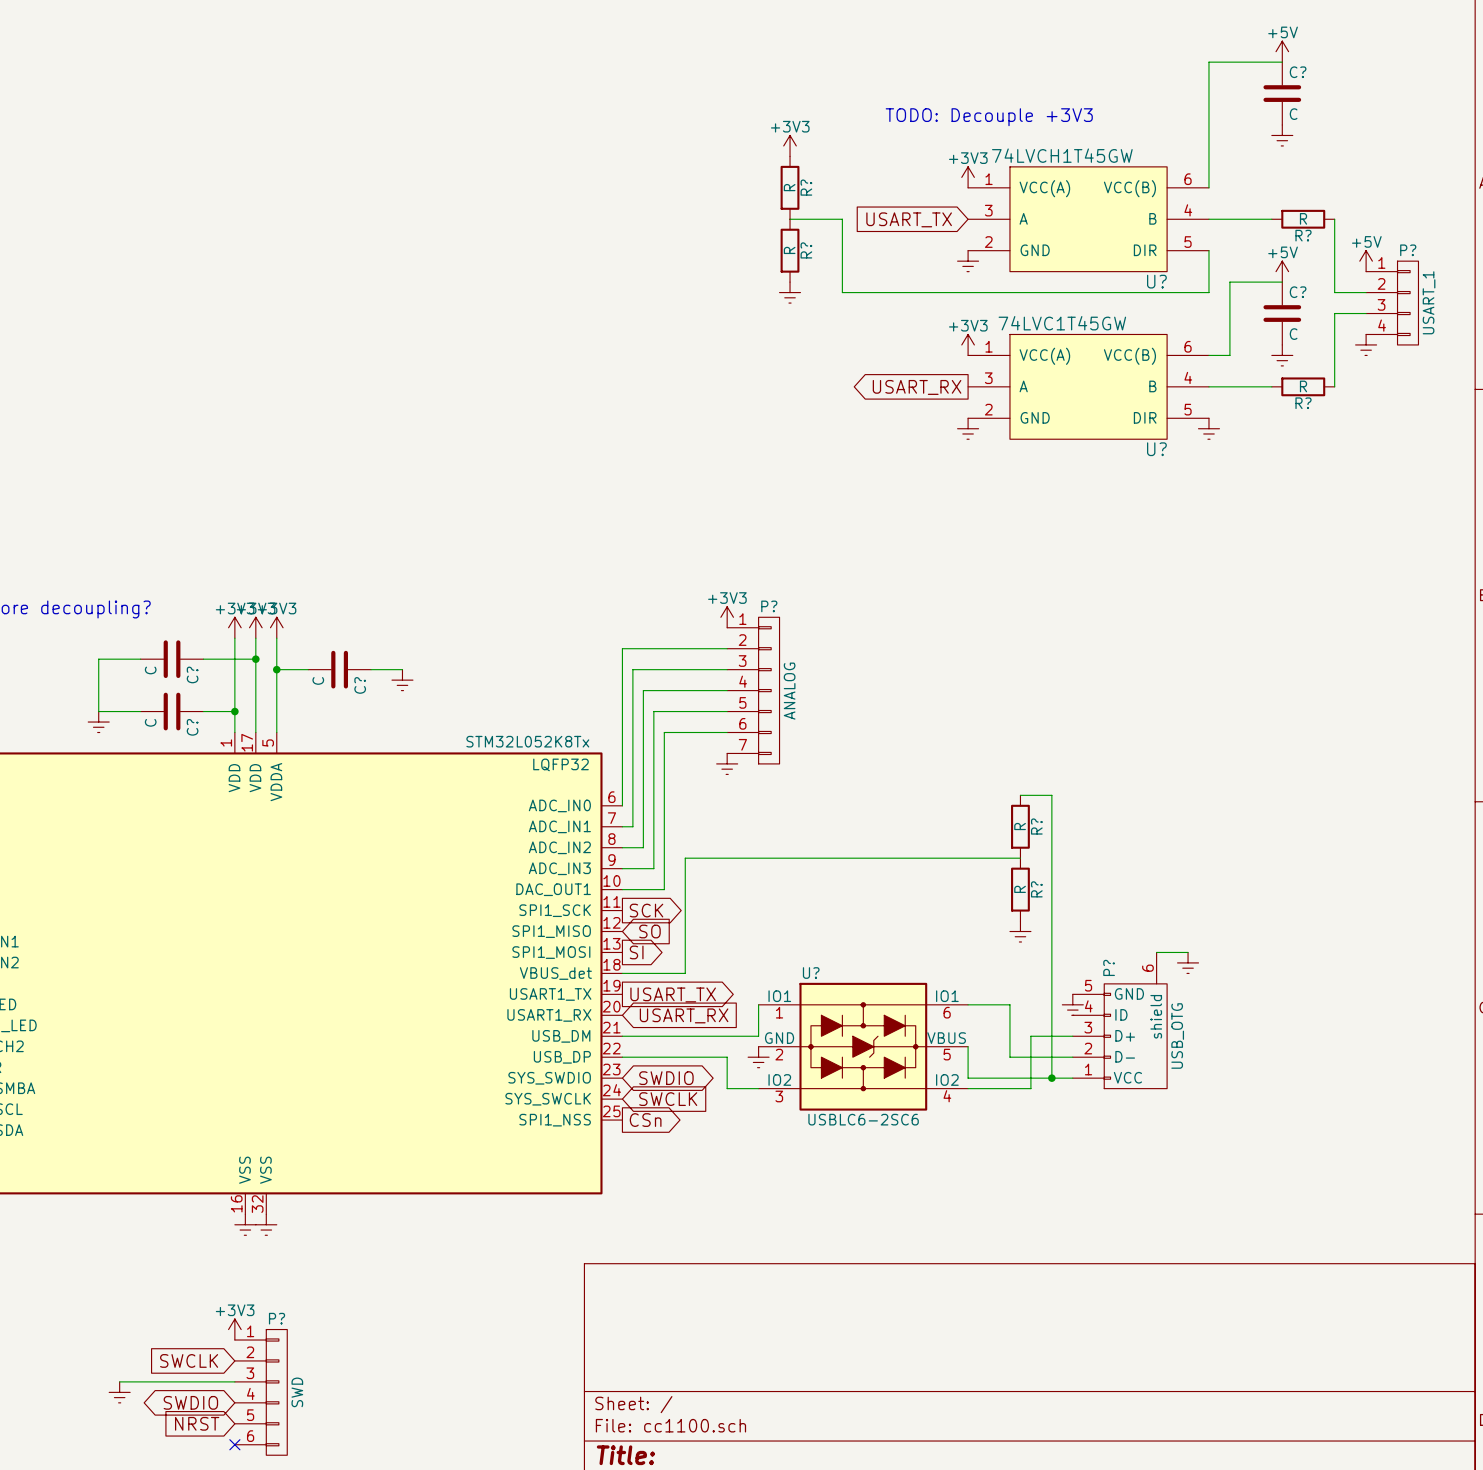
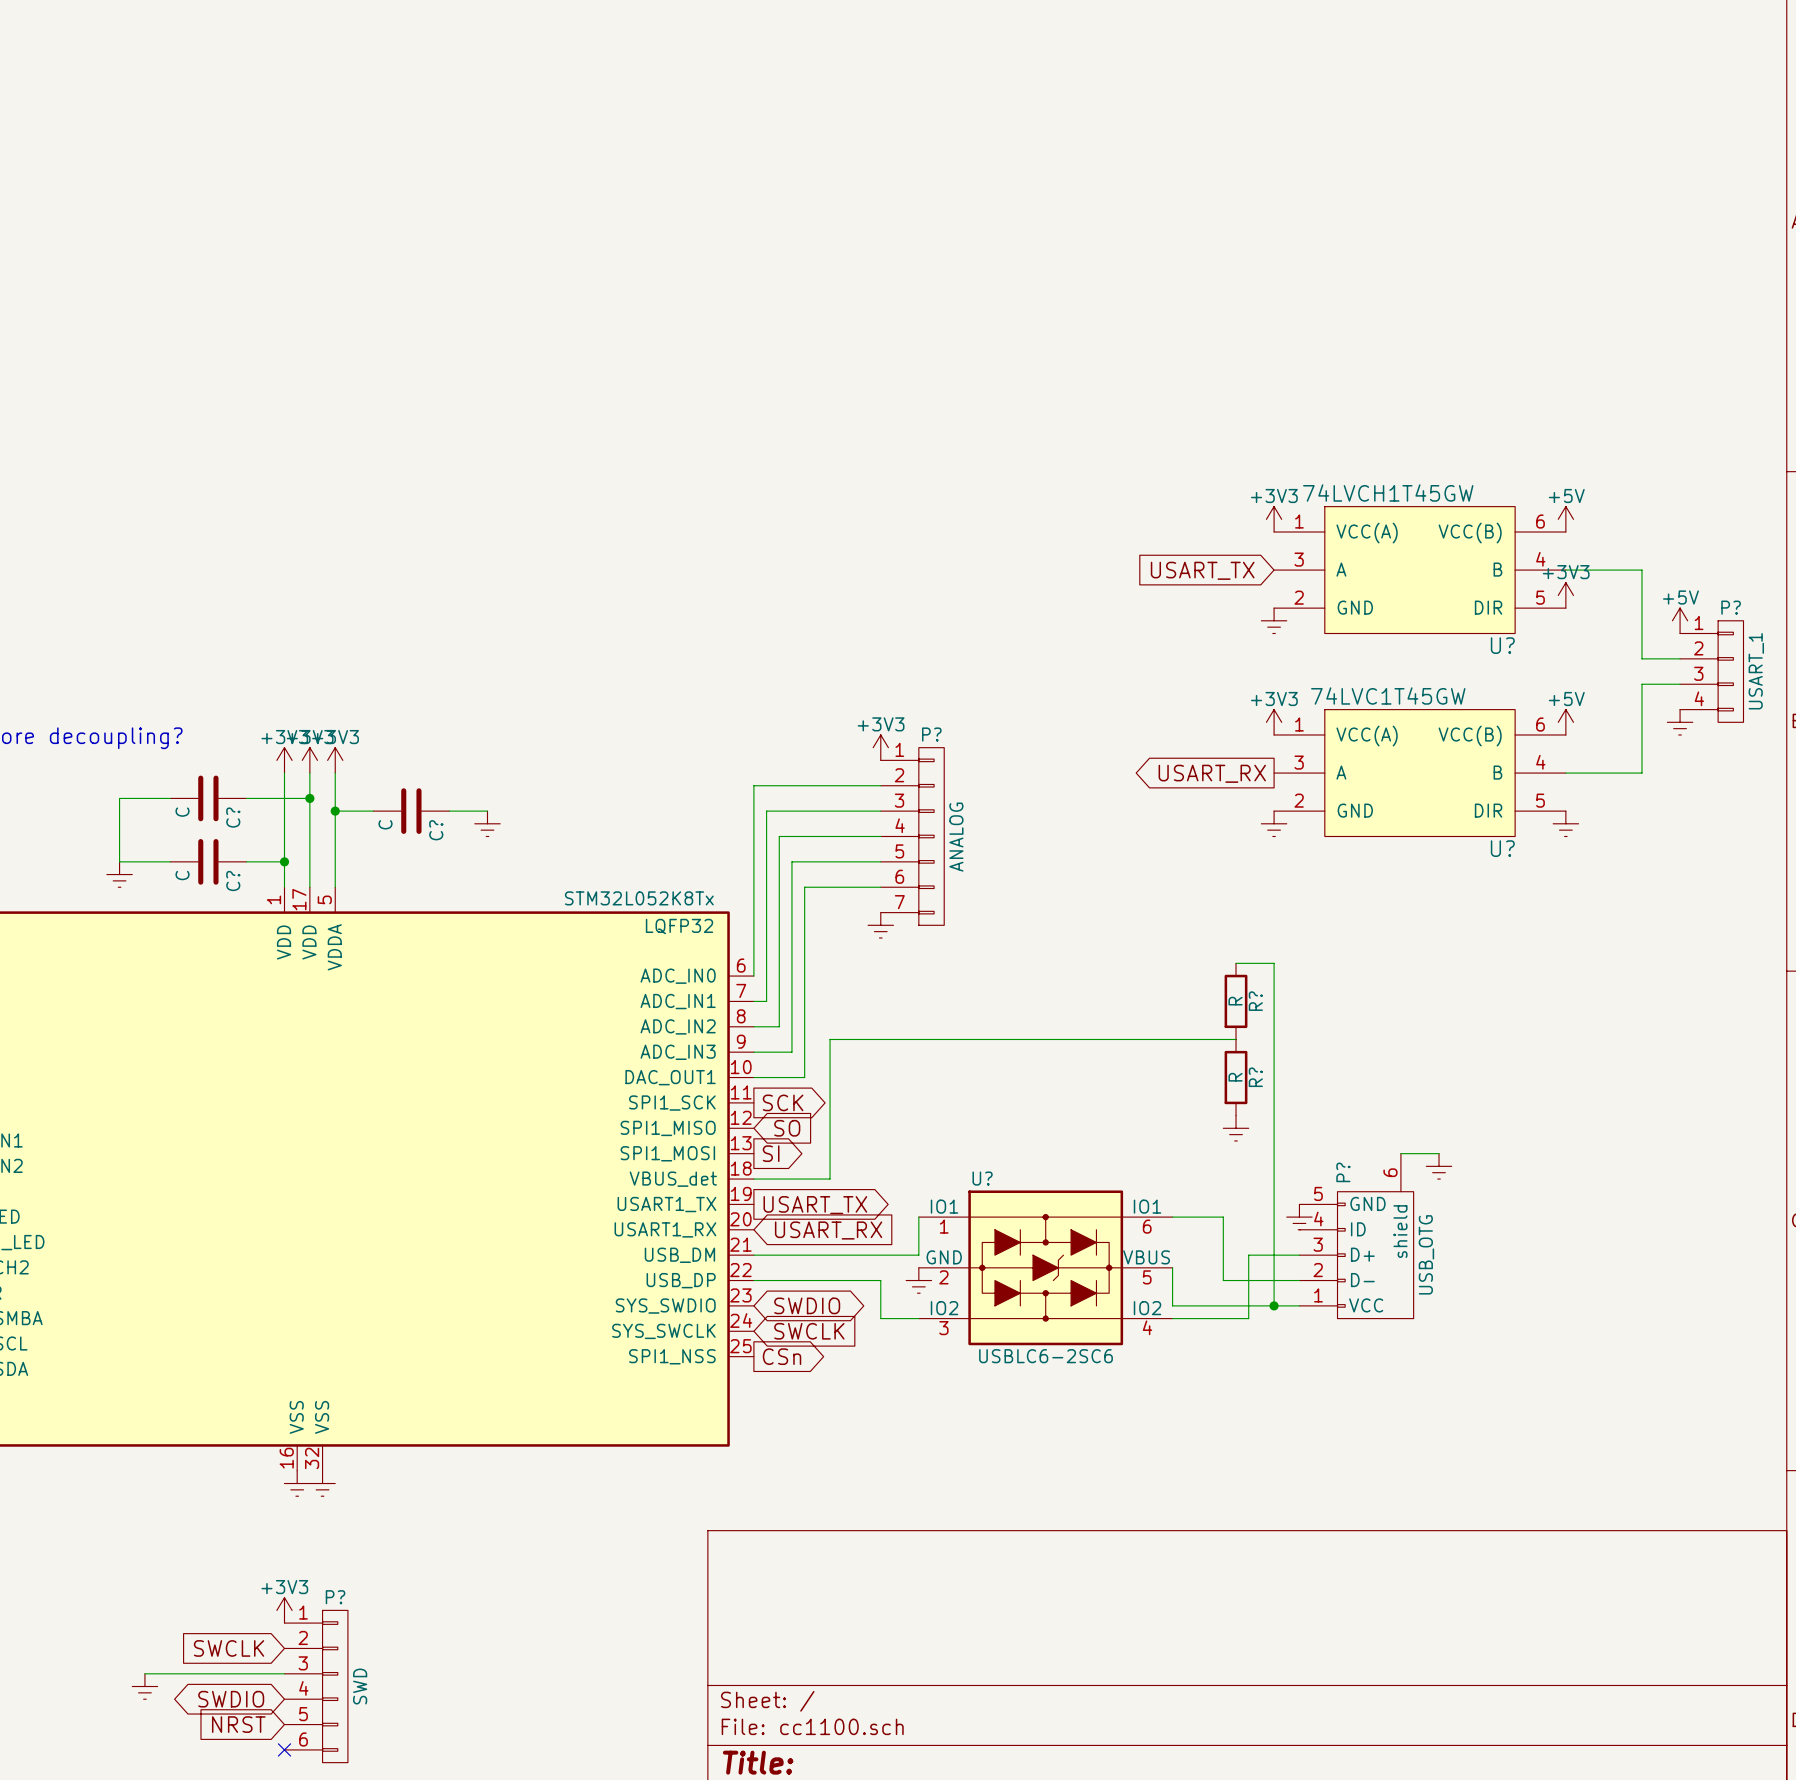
power symbol: +5V (1282, 51) -> none
wire: (1282, 62) (1208, 62) (1208, 187) -> none
C?: C (1282, 93) -> none
text: TODO: Decouple +3V3 (989, 117) -> none
power symbol: (1282, 135) -> none
power symbol: +3V3 (790, 145) -> none
power symbol: +3V3 (968, 177) -> none
R?: R (790, 187) -> none
wire: (790, 219) (842, 219) (842, 292) (1208, 292) (1208, 250) -> none
global label: USART_TX (909, 219) -> none
U?: 74LVCH1T45GW (1088, 219) -> none
wire: (1208, 219) (1271, 219) -> none
R?: R (1303, 219) -> none
wire: (1334, 219) (1334, 292) (1366, 292) -> none
R?: R (790, 250) -> none
power symbol: (968, 261) -> none
power symbol: +5V (1366, 261) -> none
power symbol: +5V (1282, 271) -> none
wire: (1282, 282) (1229, 282) (1229, 355) (1208, 355) -> none
power symbol: (790, 292) -> none
P?: USART_1 (1392, 303) -> none
C?: C (1282, 313) -> none
wire: (1366, 313) (1334, 313) (1334, 386) -> none
power symbol position: +3V3 (968, 344) -> +3V3 (1274, 519)
power symbol: (1366, 344) -> none
power symbol: (1282, 355) -> none
U?: 74LVC1T45GW (1088, 386) -> none
wire: (1208, 386) (1271, 386) -> none
R?: R (1303, 386) -> none
global label: USART_RX (917, 387) -> none
power symbol: (968, 428) -> none
power symbol: (1208, 428) -> none
power symbol: none -> +5V (1565, 519)
U?: none -> 74LVCH1T45GW (1419, 570)
wire: none -> (1565, 570) (1641, 570) (1641, 658) (1680, 658)
global label: none -> USART_TX (1202, 570)
power symbol: none -> +3V3 (1565, 595)
power symbol: none -> (1274, 620)
power symbol: none -> +5V (1680, 620)
P?: none -> USART_1 (1711, 671)
wire: none -> (1680, 684) (1641, 684) (1641, 773) (1565, 773)
power symbol: none -> +3V3 (1274, 722)
power symbol: none -> +5V (1565, 722)
power symbol: none -> (1680, 722)
global label: none -> USART_RX (1212, 773)
U?: none -> 74LVC1T45GW (1419, 773)
power symbol: none -> (1274, 823)
power symbol: none -> (1565, 823)

